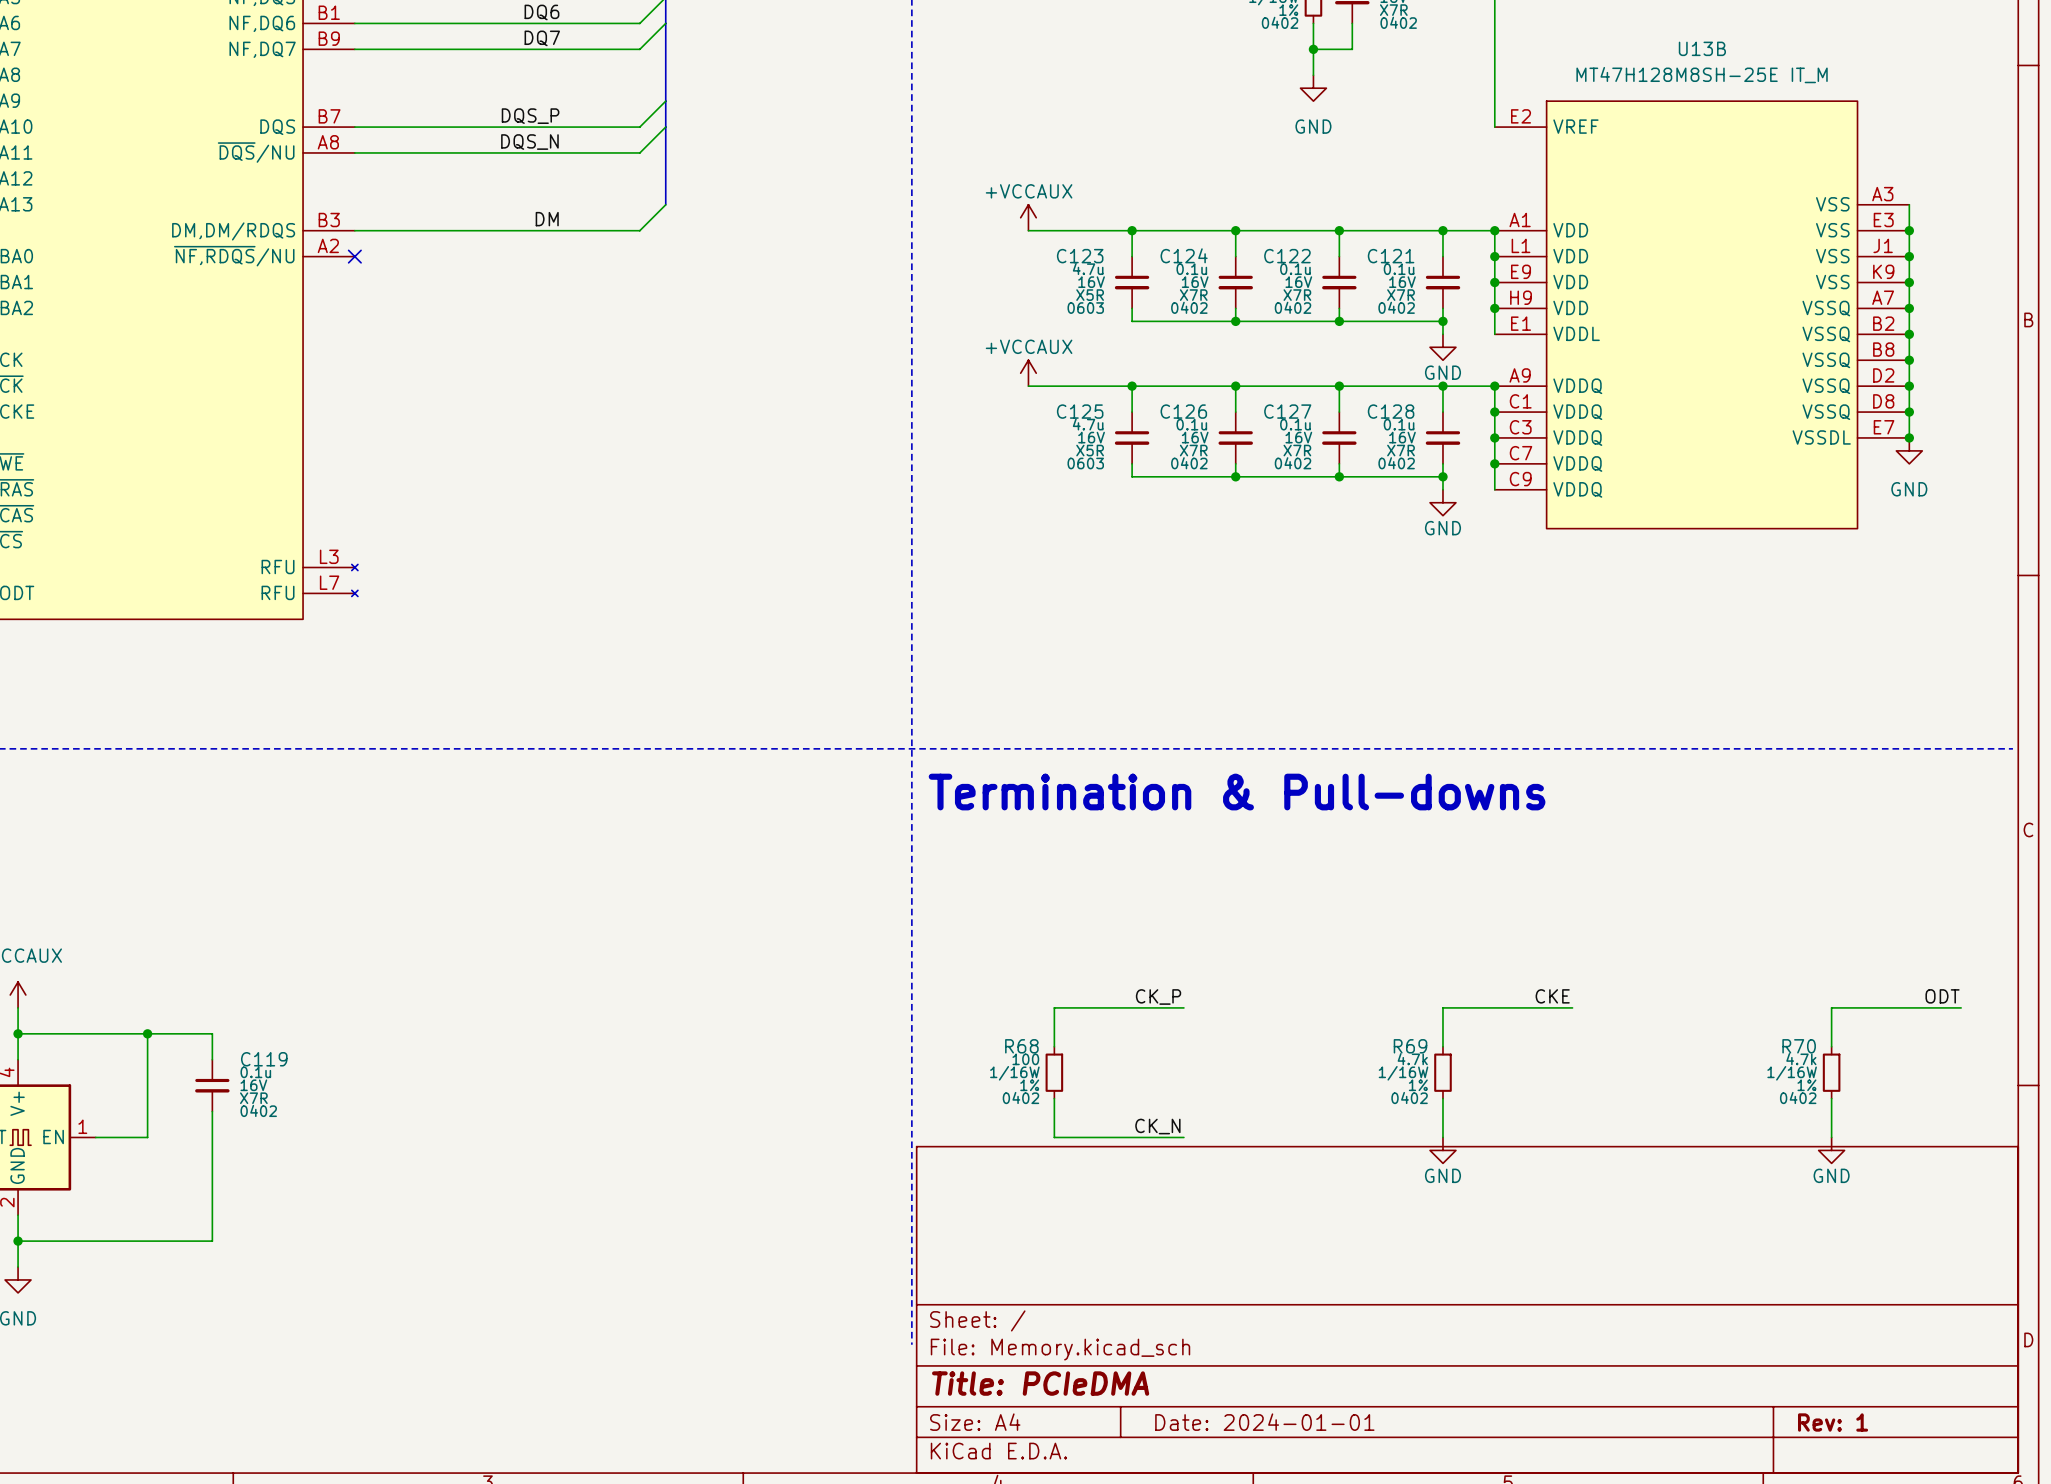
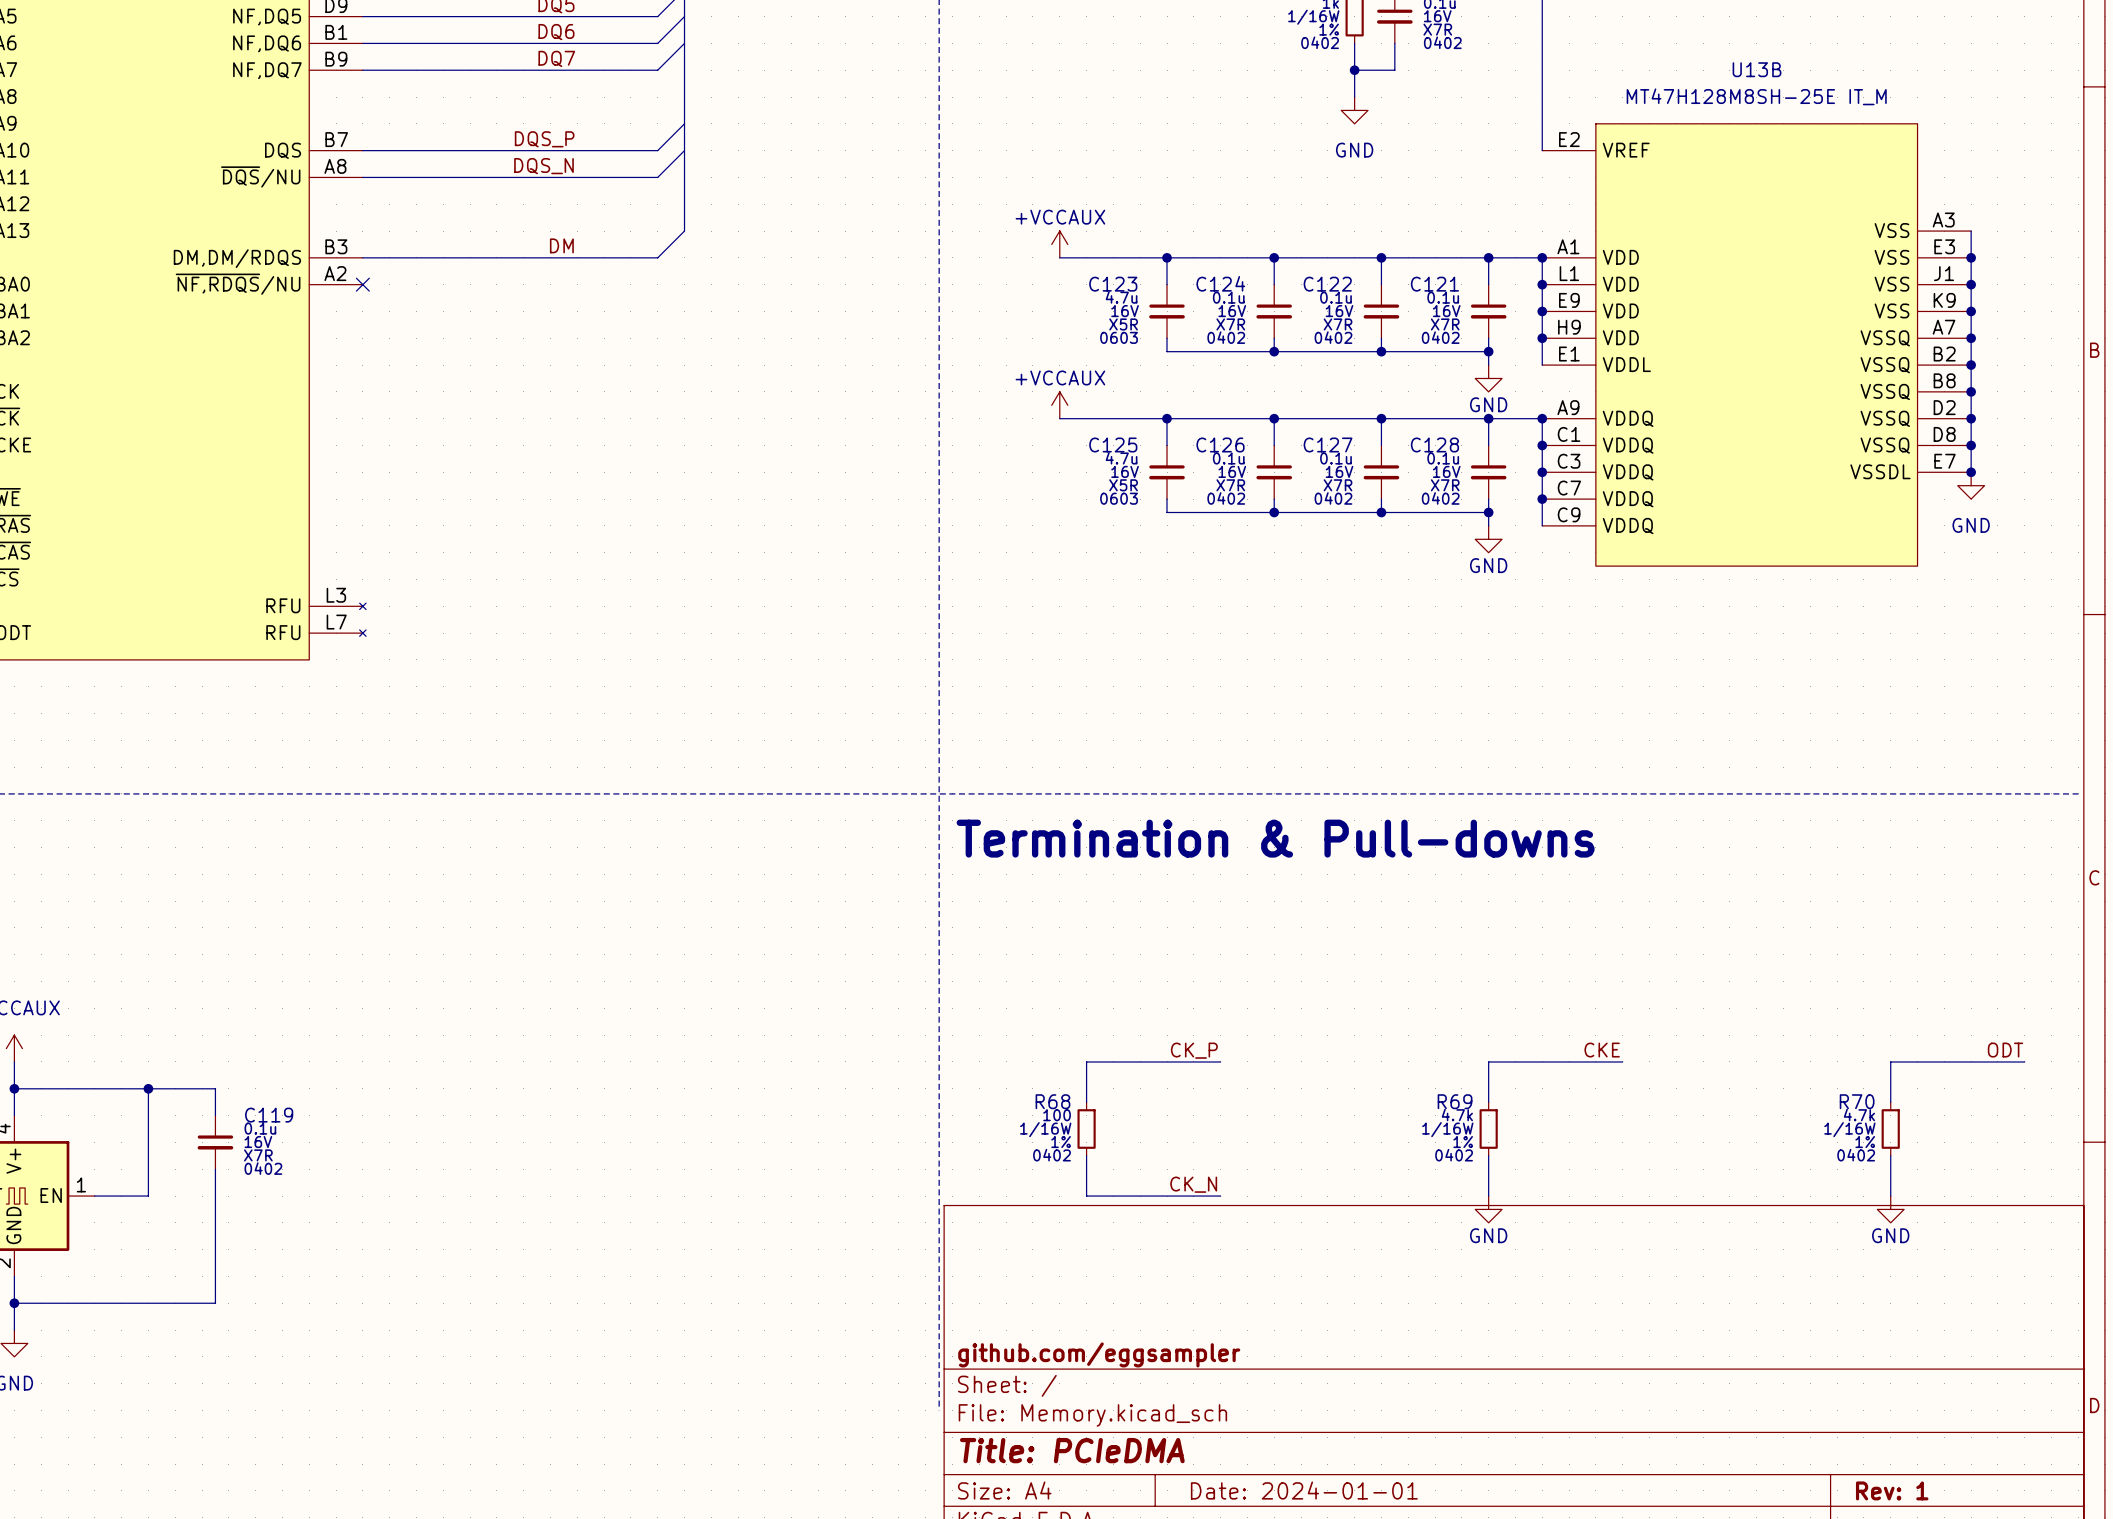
title block: none -> github.com/eggsampler (1099, 1354)

